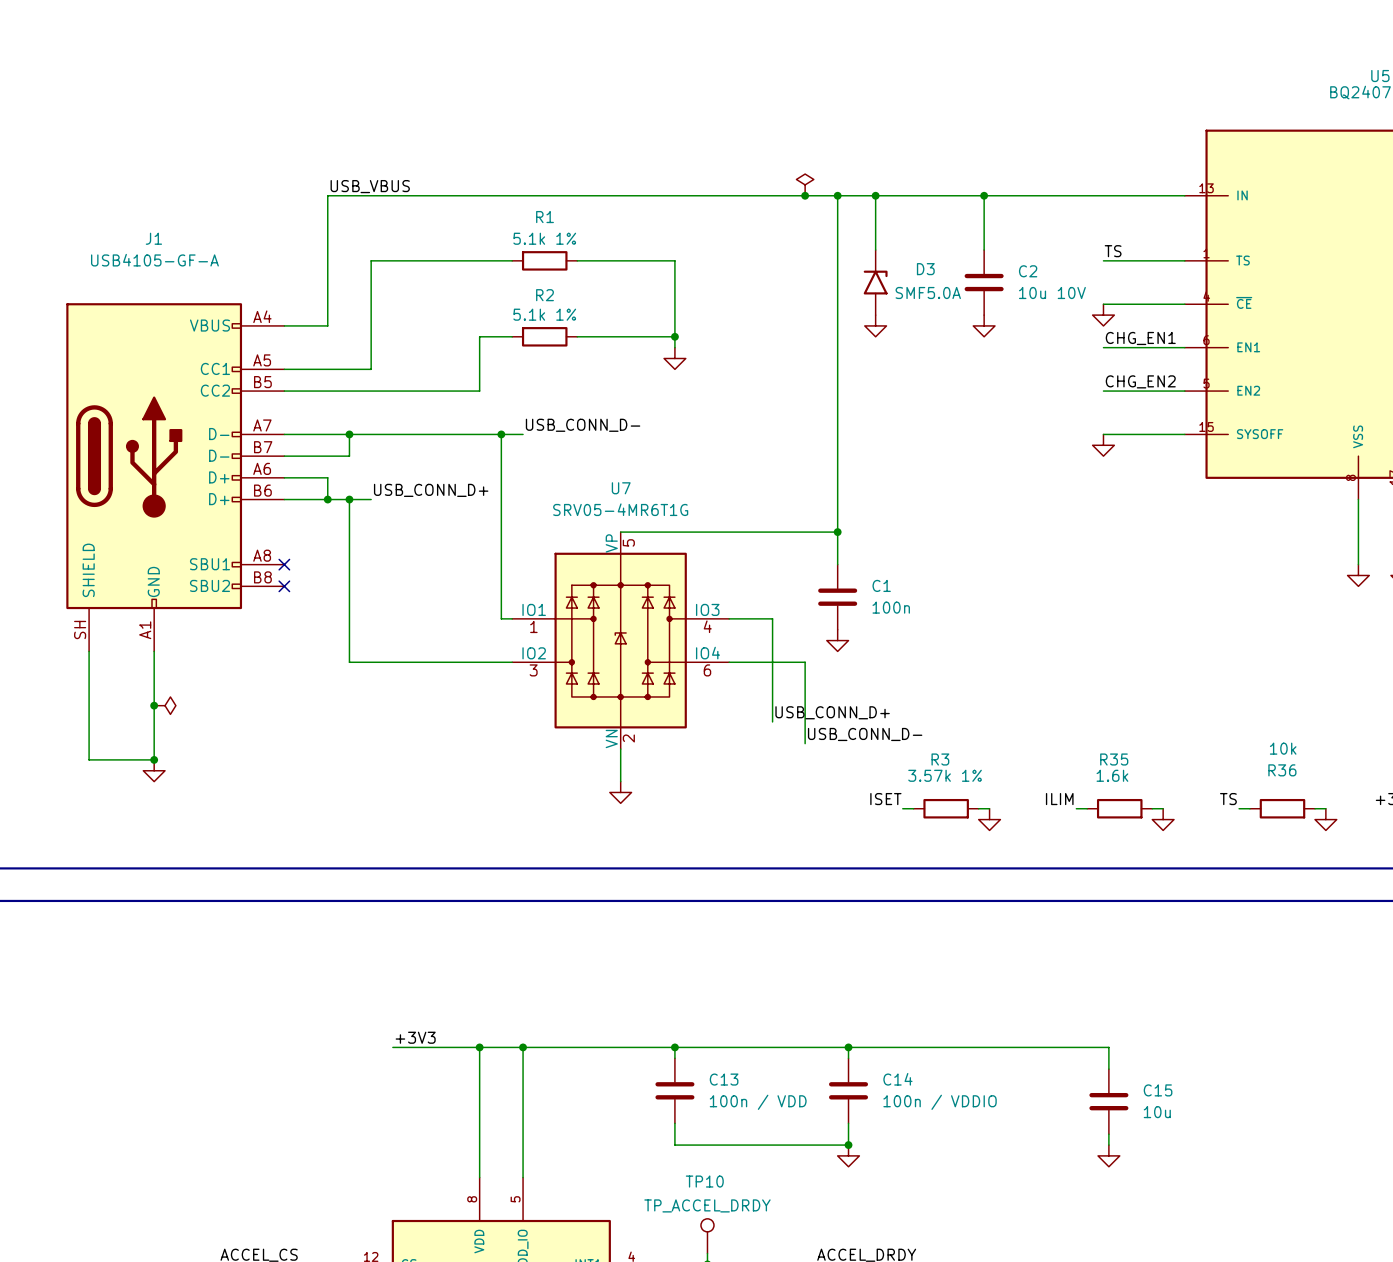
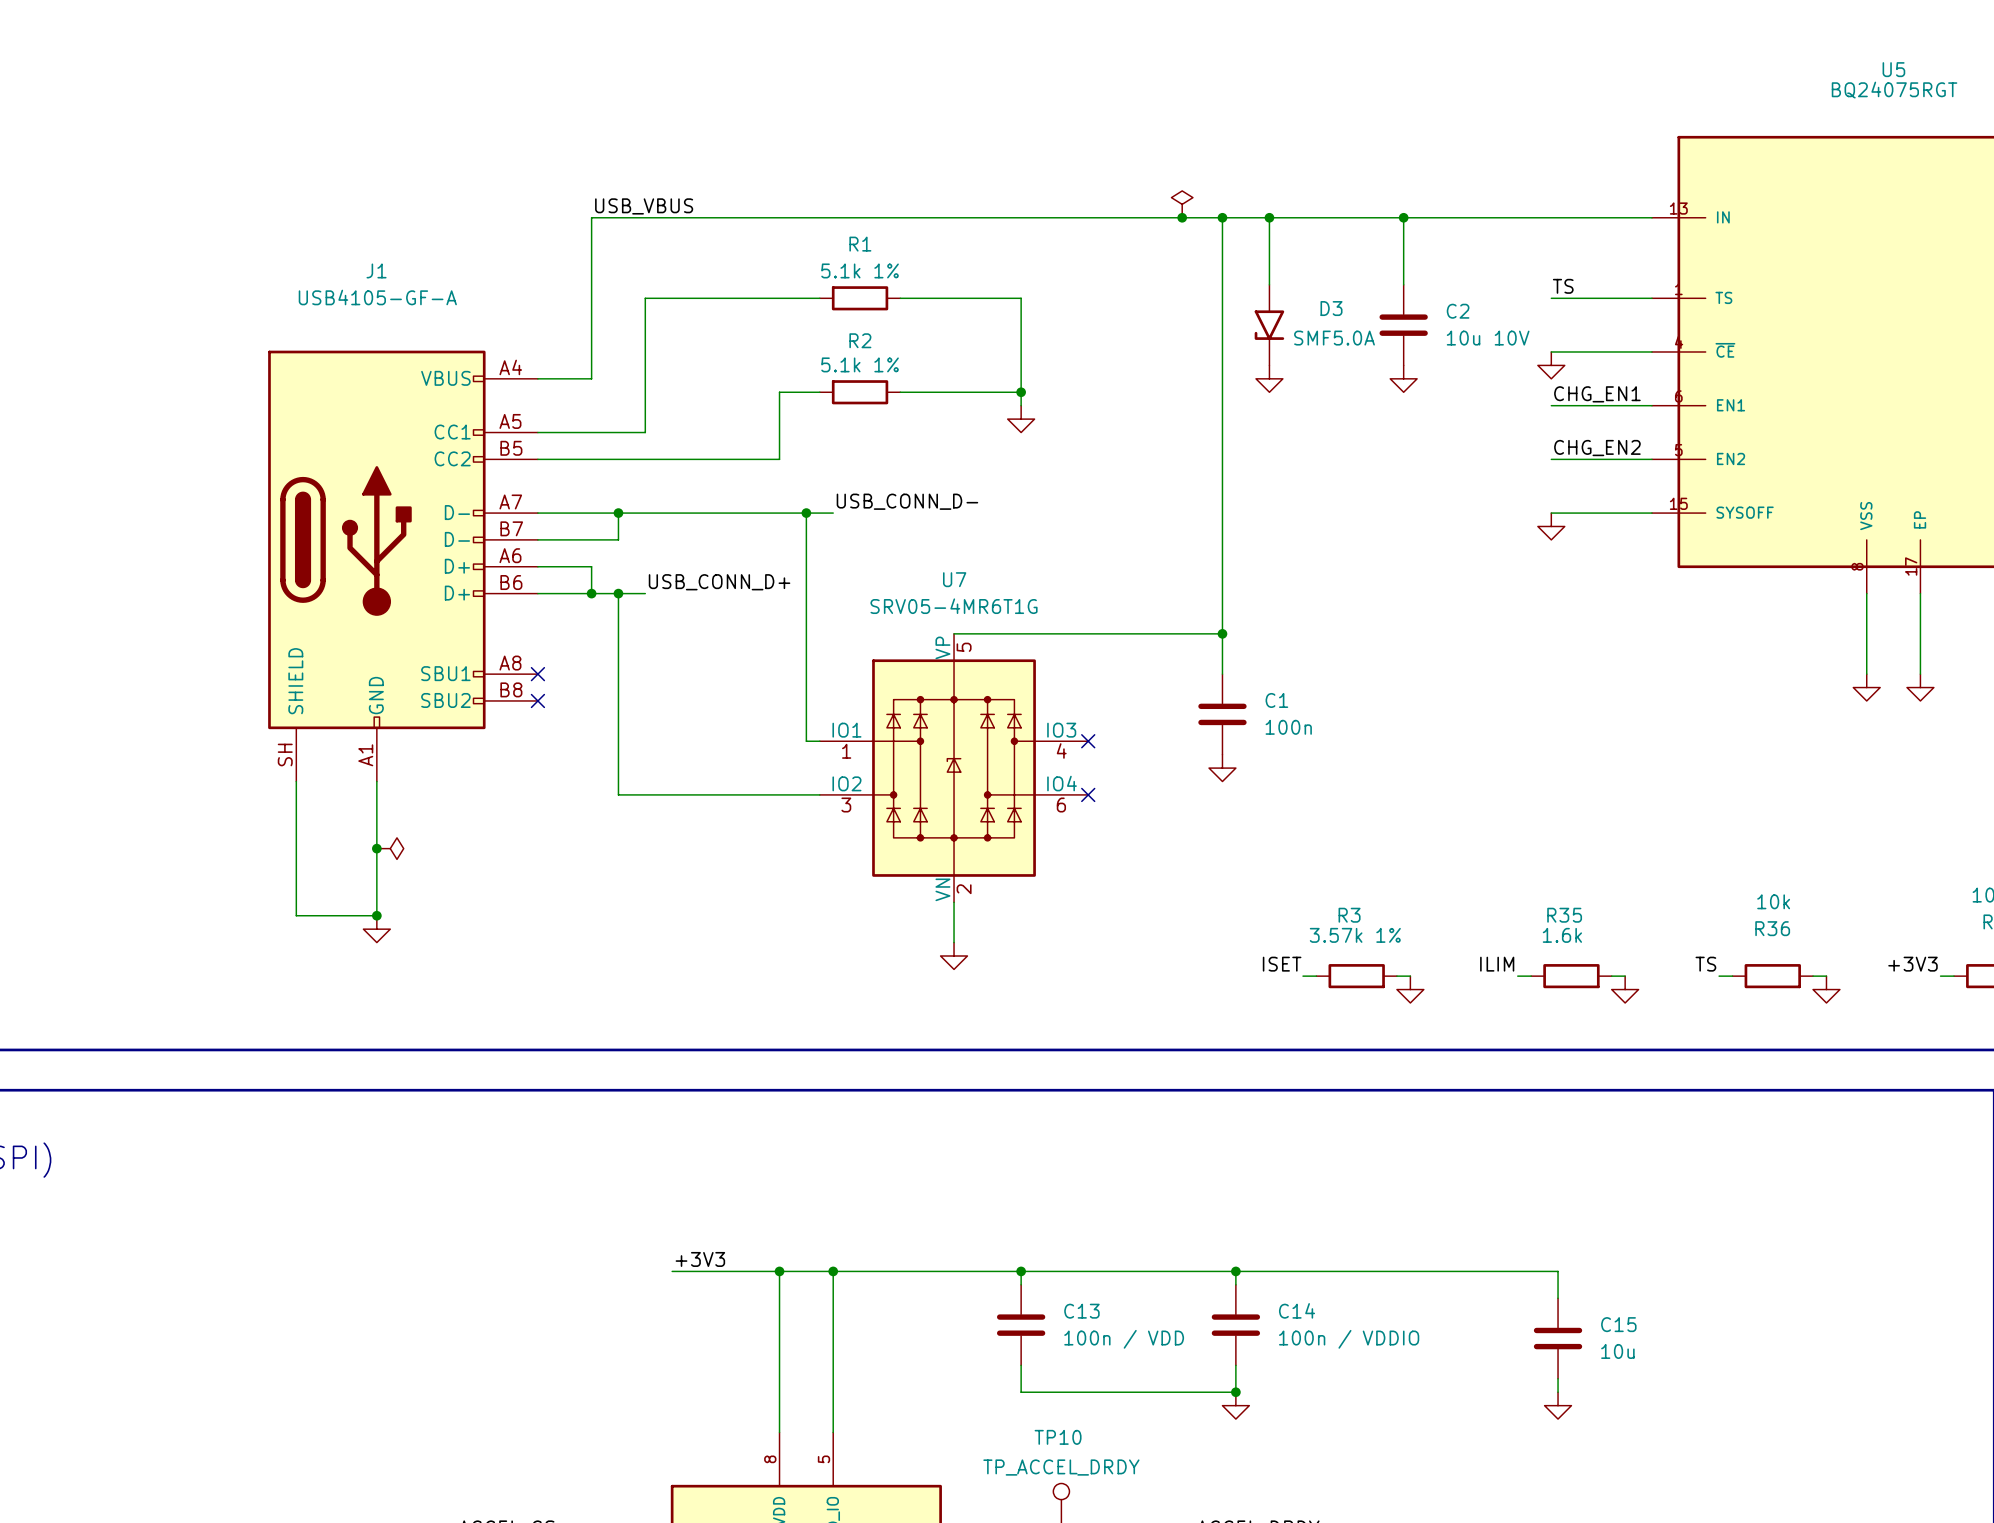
D3 rotation: 0° (875, 282) -> 180° (1269, 325)
wire: (729, 618) (772, 618) (772, 721) -> none
no-connect mark: none -> (1088, 741)
wire: (729, 662) (805, 662) (805, 743) -> none
no-connect mark: none -> (1088, 794)
label: USB_CONN_D+ (832, 712) -> none
label: USB_CONN_D- (865, 734) -> none

